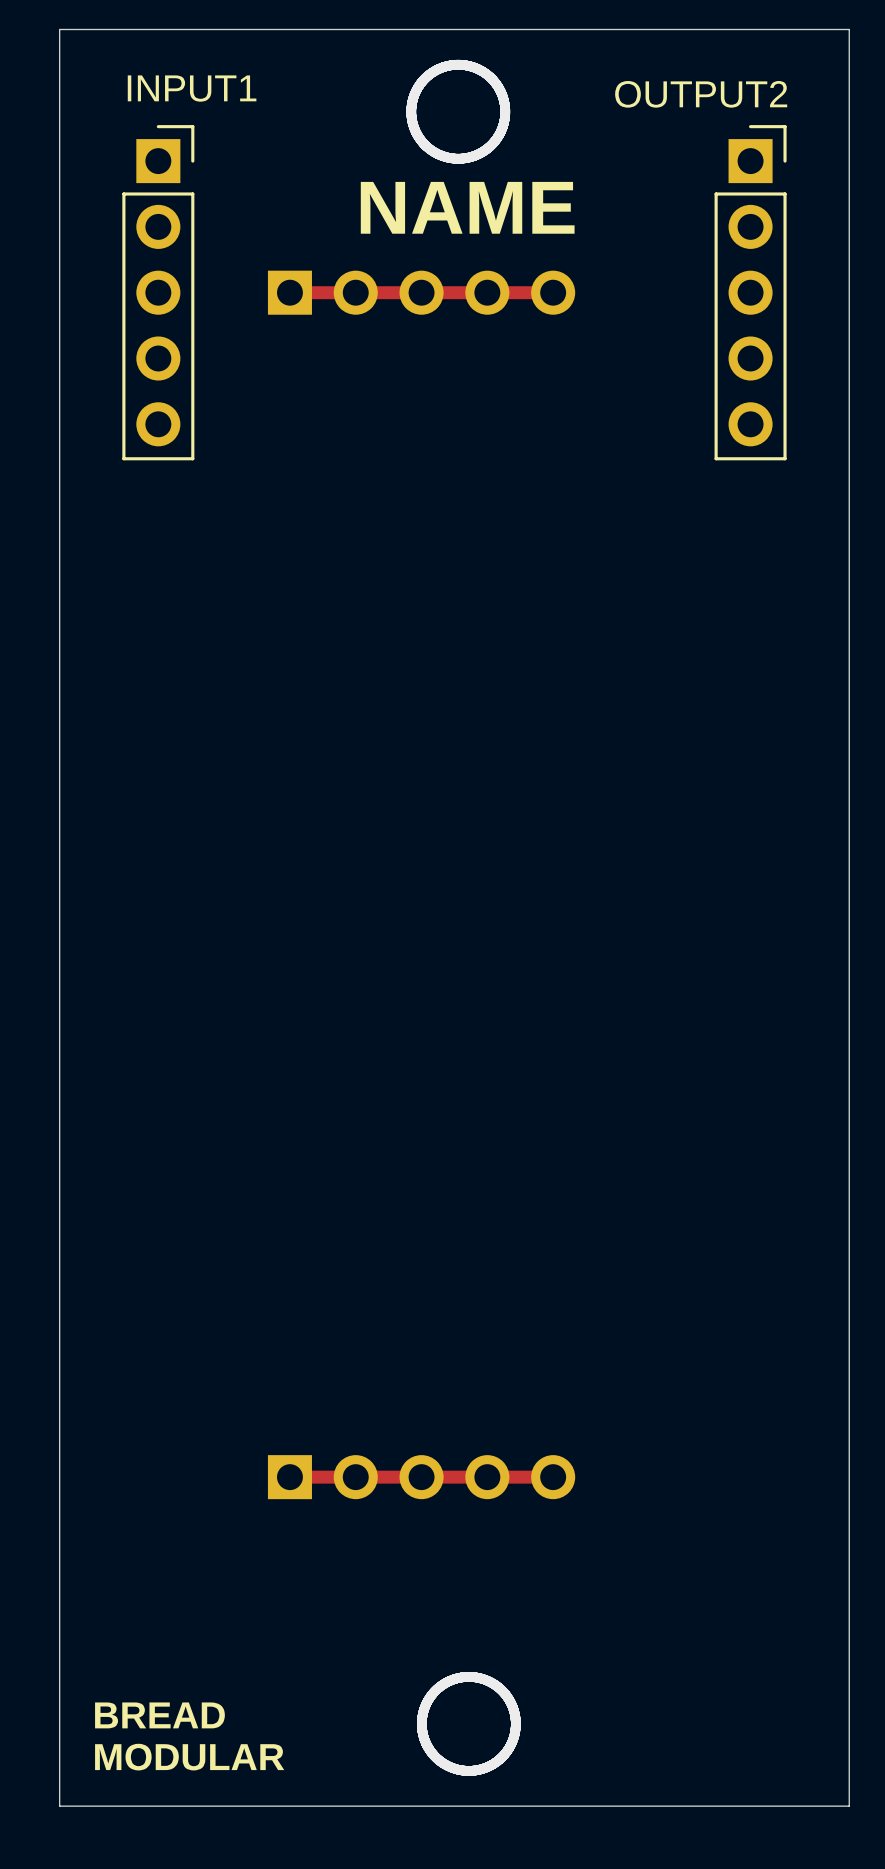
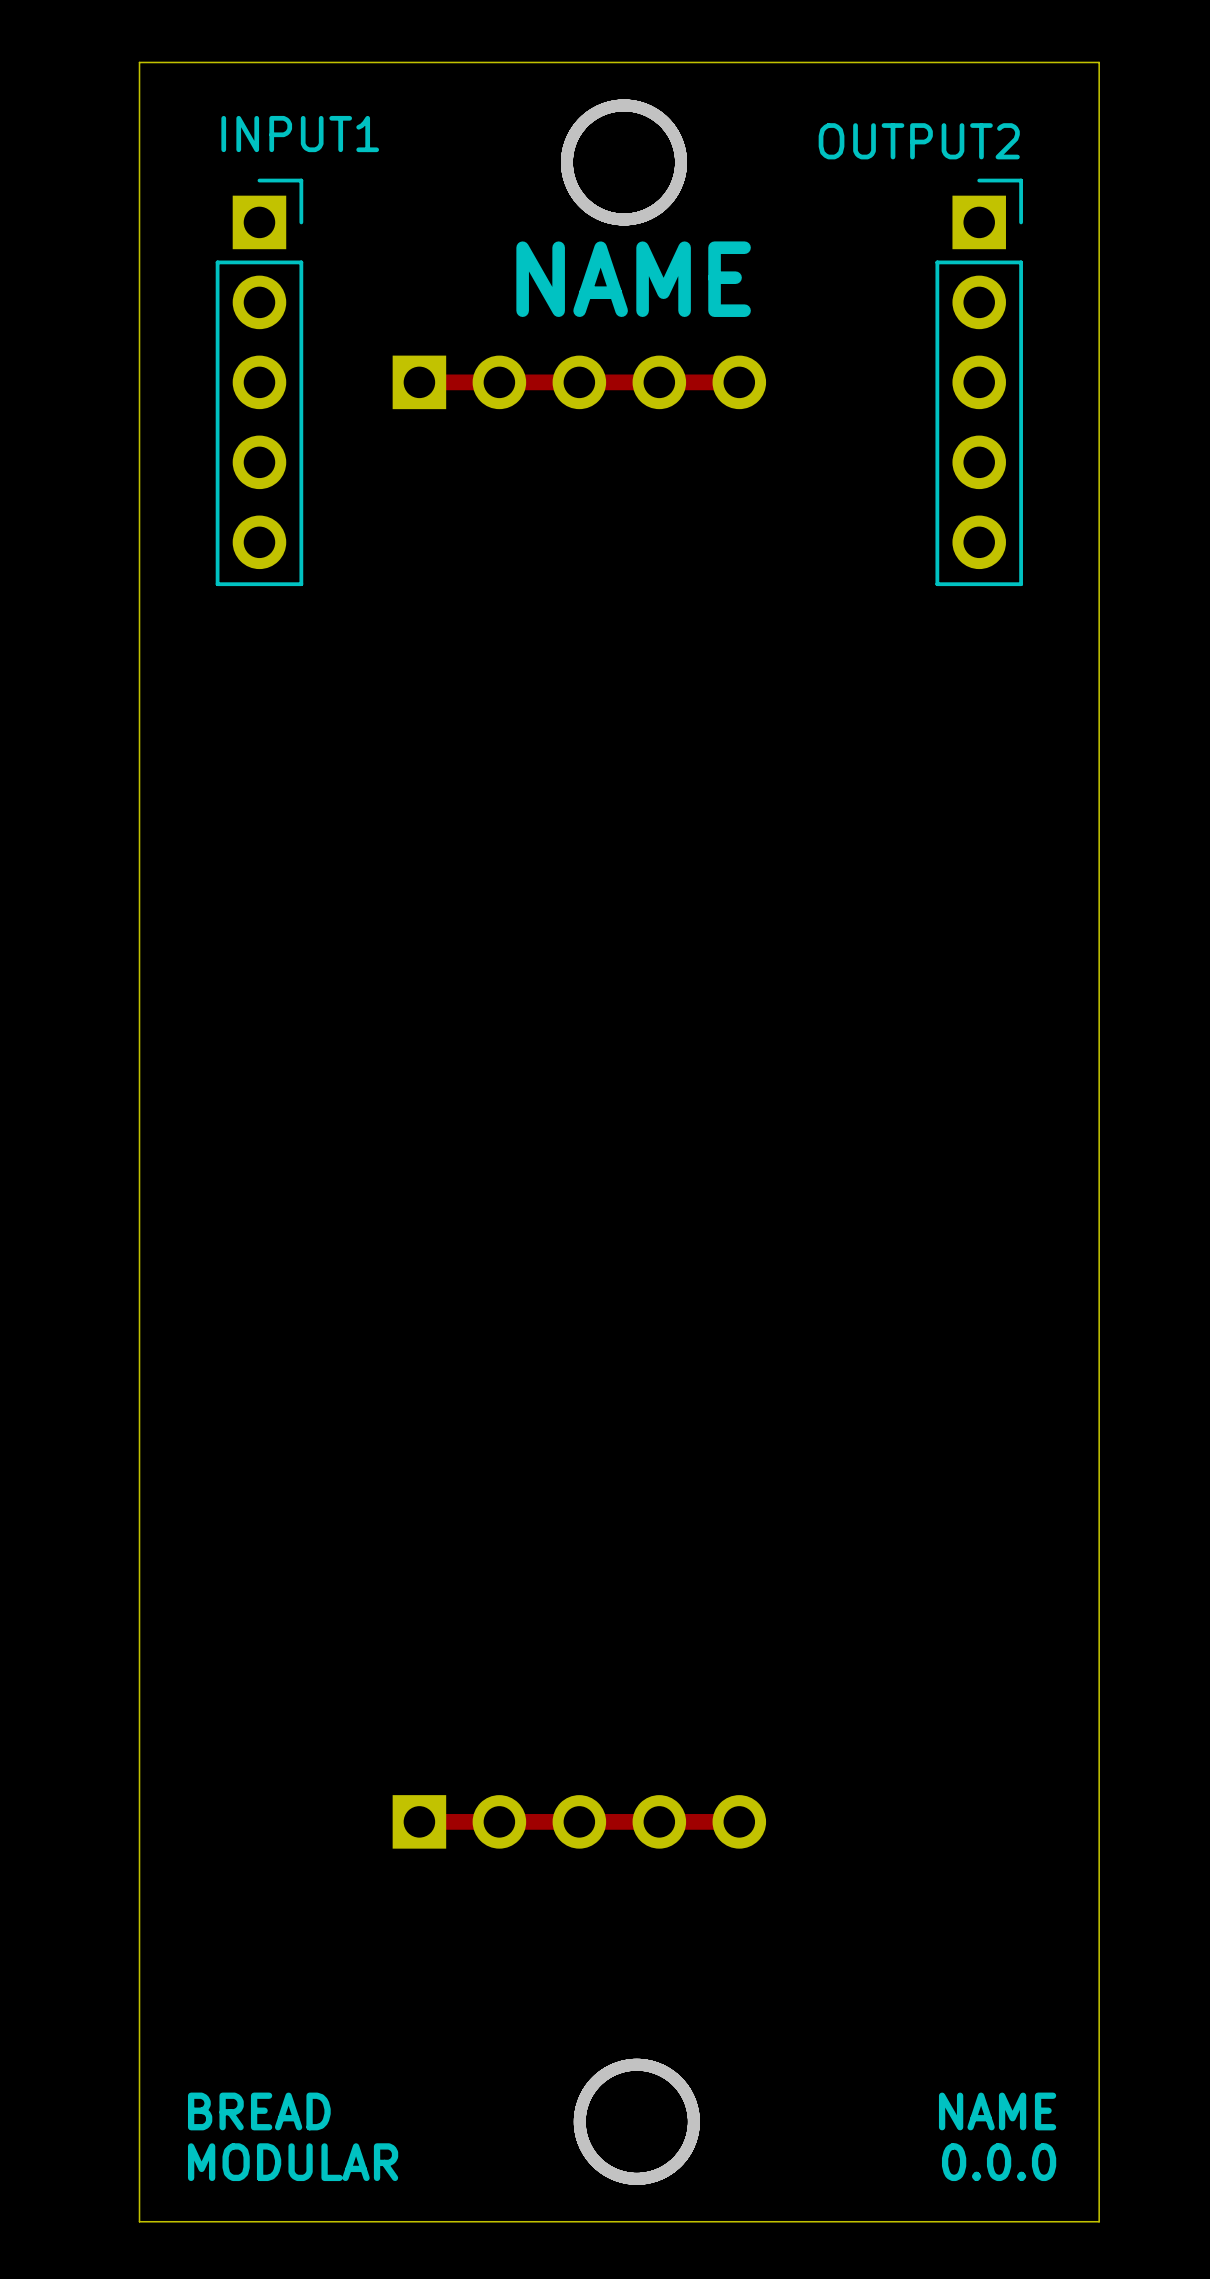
text: none -> NAME (997, 2111)
text: none -> 0.0.0 (999, 2162)

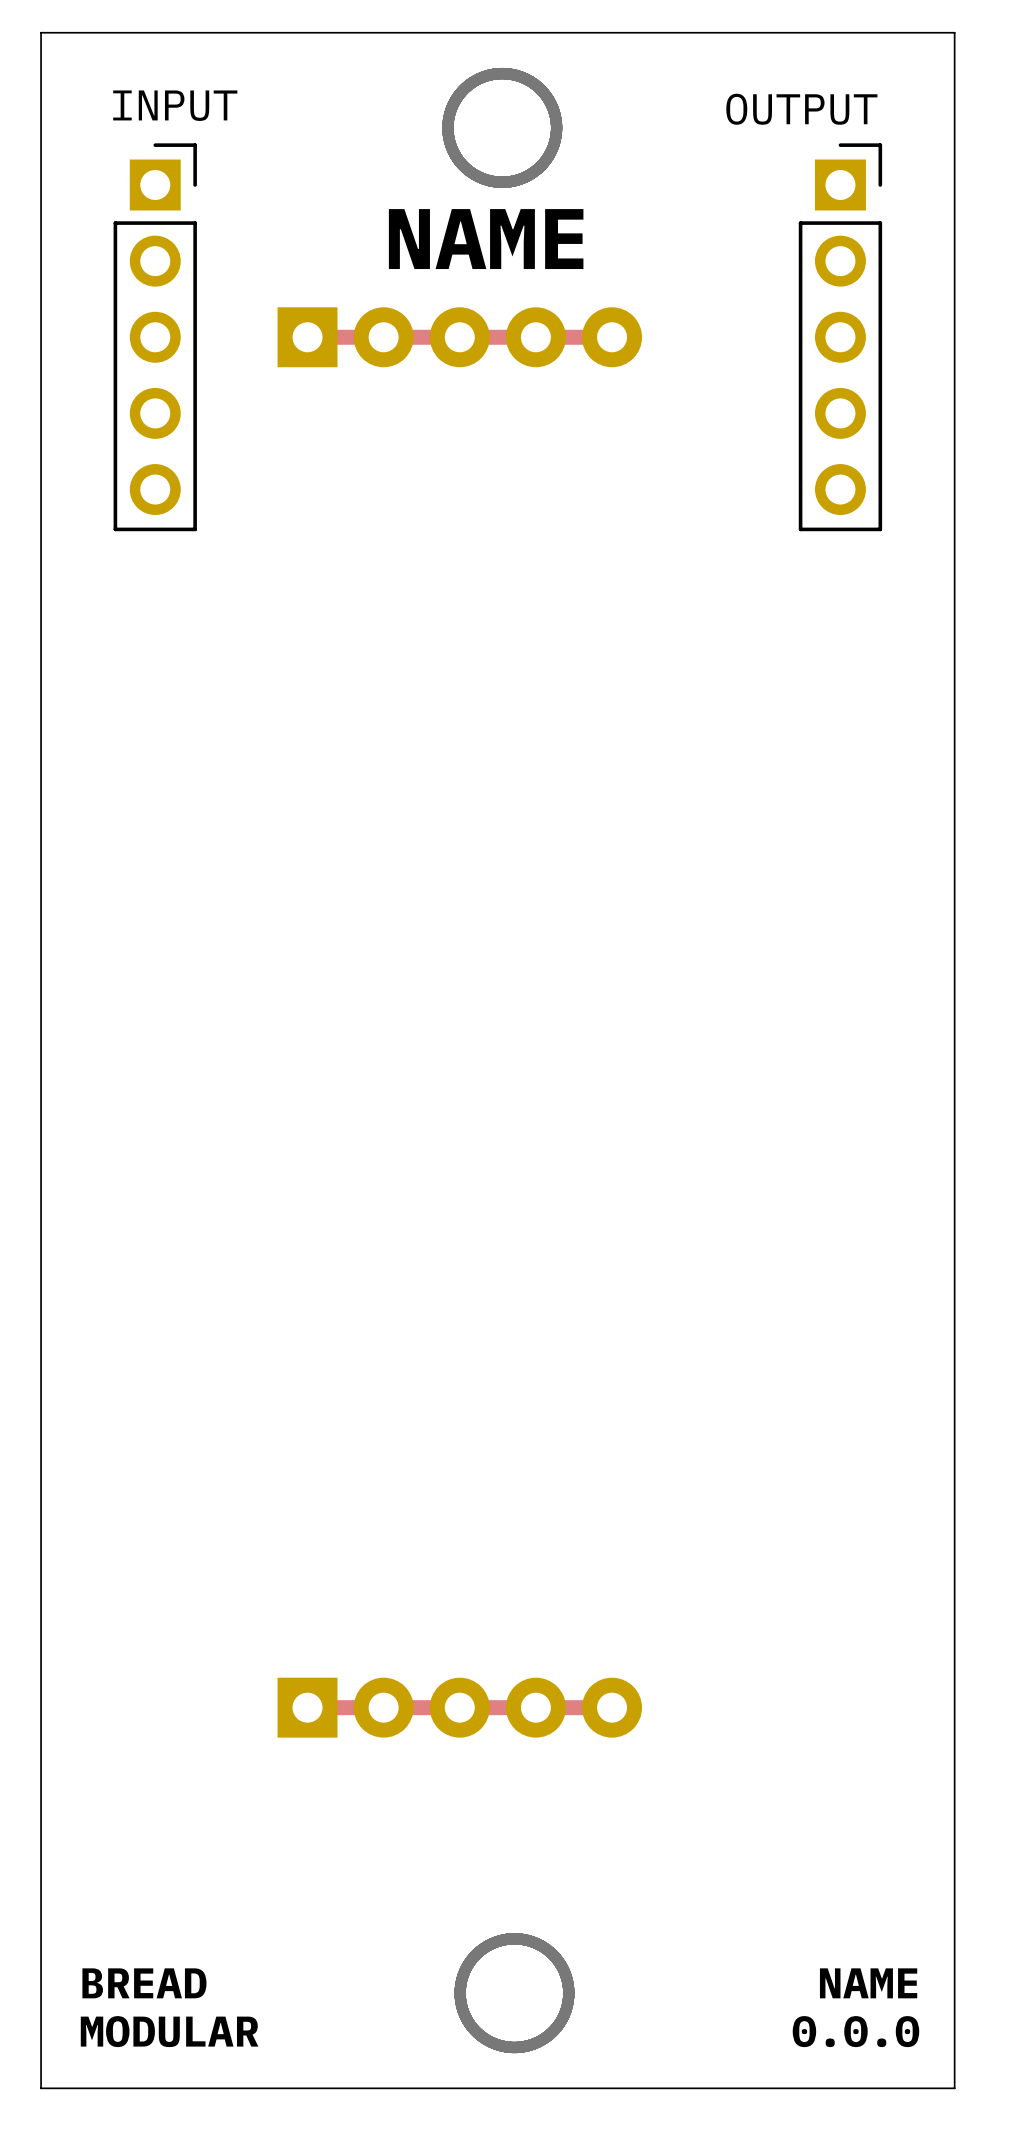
INPUT1 name: INPUT1 (300, 134) -> none
text: none -> INPUT (175, 105)
OUTPUT2 name: OUTPUT2 (919, 141) -> none
text: none -> OUTPUT (801, 109)
part footprint: [392, 355, 767, 410] -> [277, 307, 643, 368]
part footprint: [392, 1795, 767, 1849] -> [277, 1677, 643, 1738]

